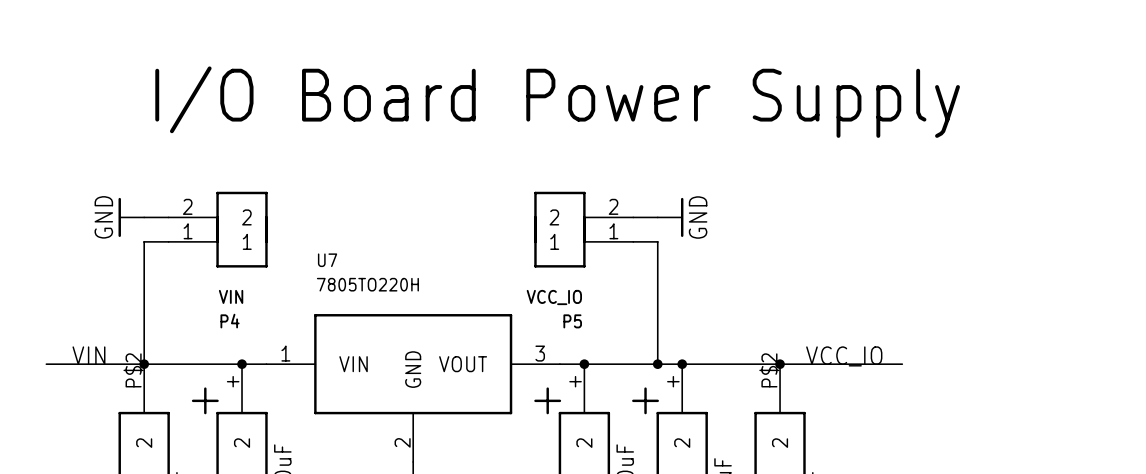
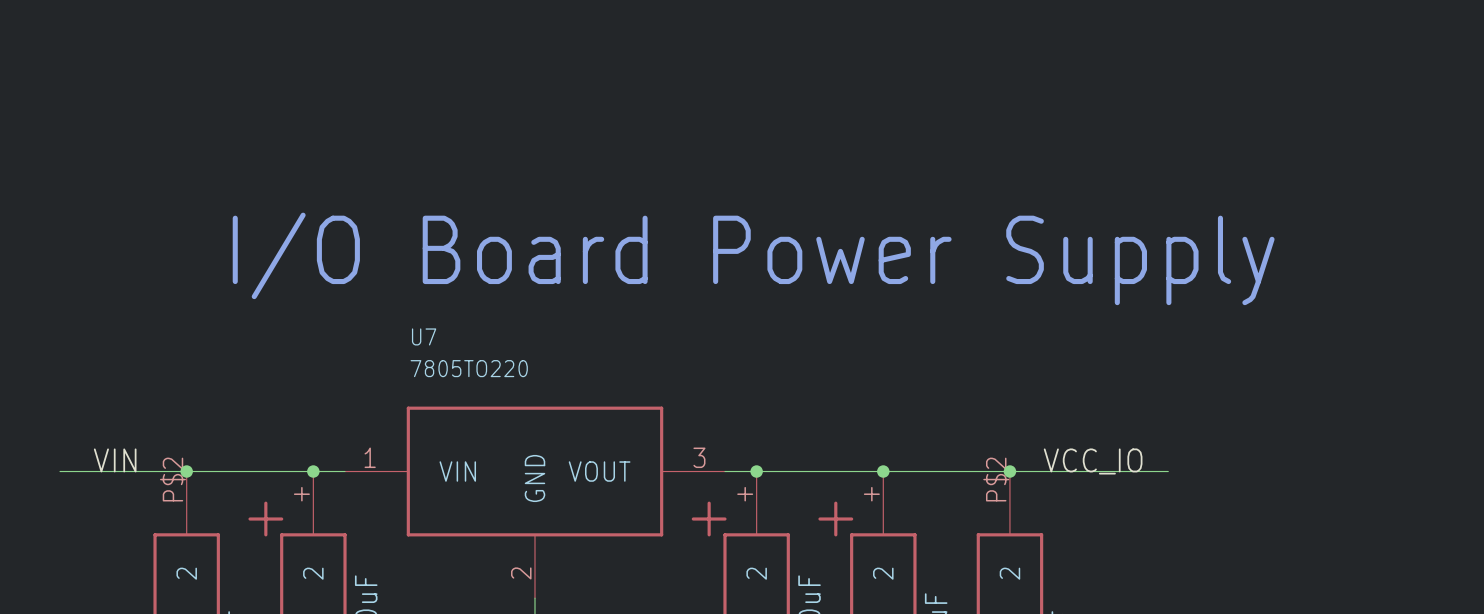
text position: I/O Board Power Supply (557, 102) -> I/O Board Power Supply (753, 258)
power symbol: GND (131, 217) -> none
wire: (144, 217) (168, 217) -> none
wire: (633, 217) (657, 217) -> none
power symbol: GND (670, 217) -> none
P4: VIN (218, 229) -> none
P5: VCC_IO (583, 229) -> none
wire: (168, 241) (144, 241) (144, 364) -> none
wire: (633, 241) (657, 241) (657, 364) -> none
U7 value: 7805TO220H (367, 284) -> 7805TO220 (469, 368)
junction: (657, 364) -> none

